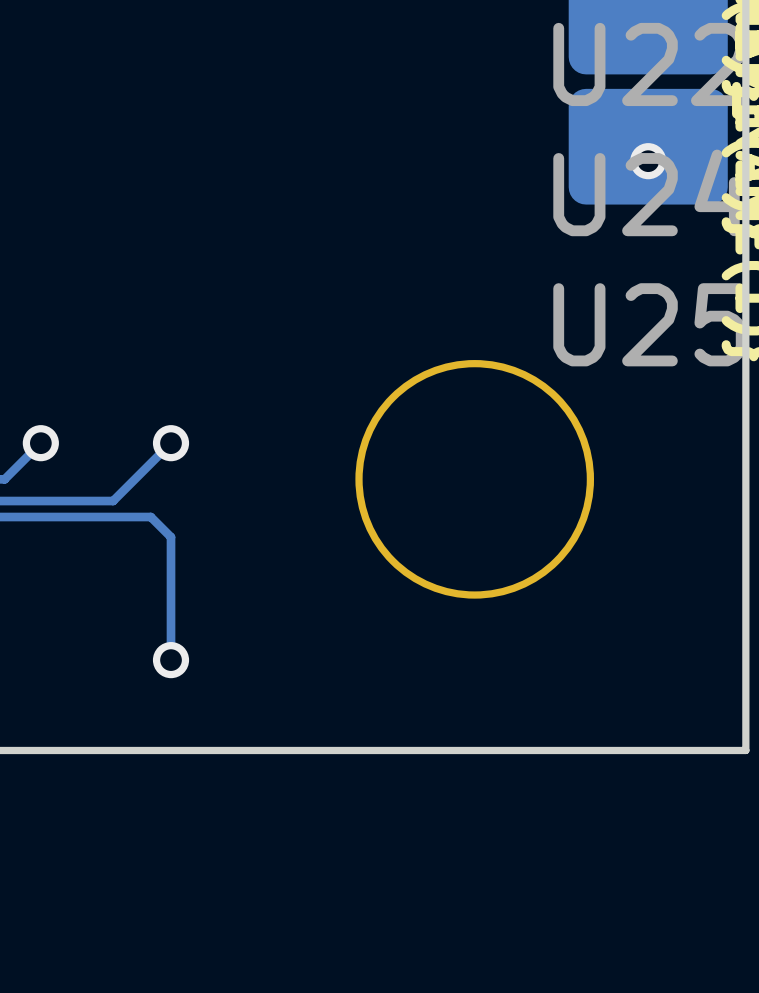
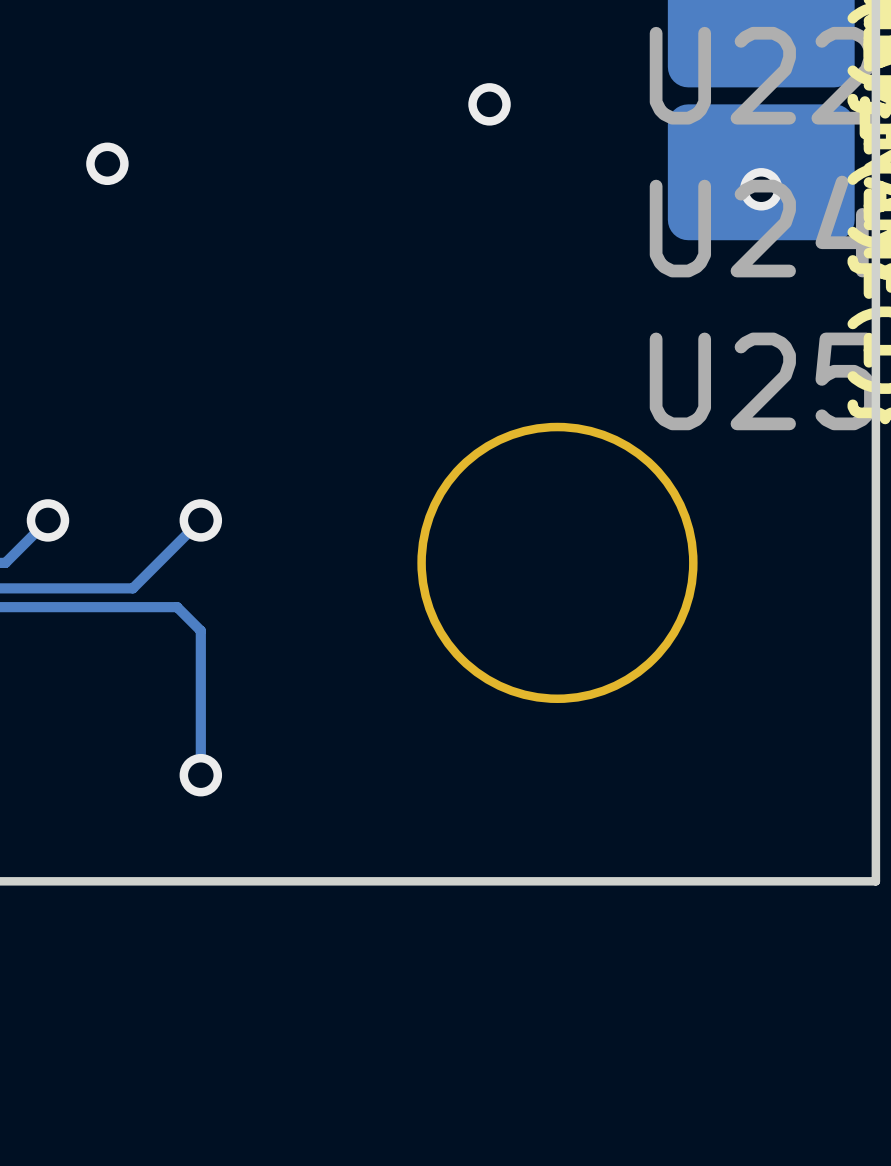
via: none -> (489, 104)
via: none -> (107, 163)

